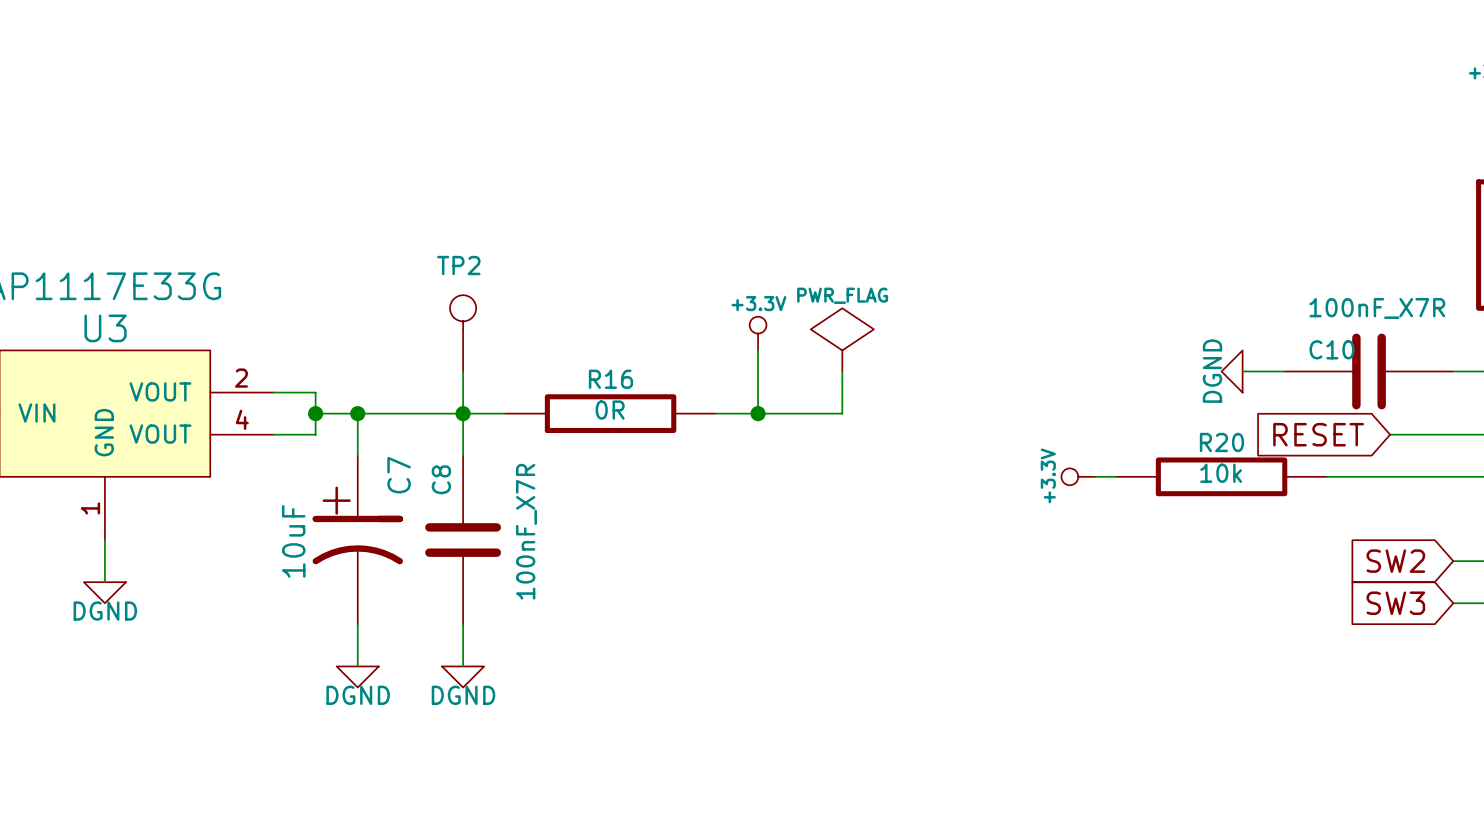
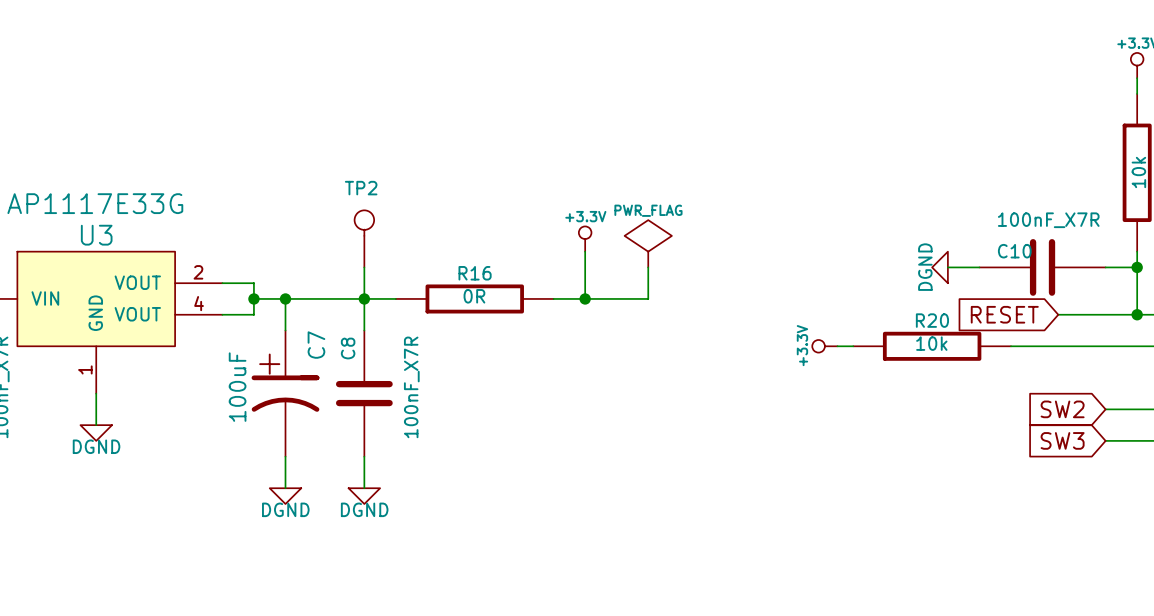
C7 value: 10uF (293, 541) -> 100uF (237, 387)

